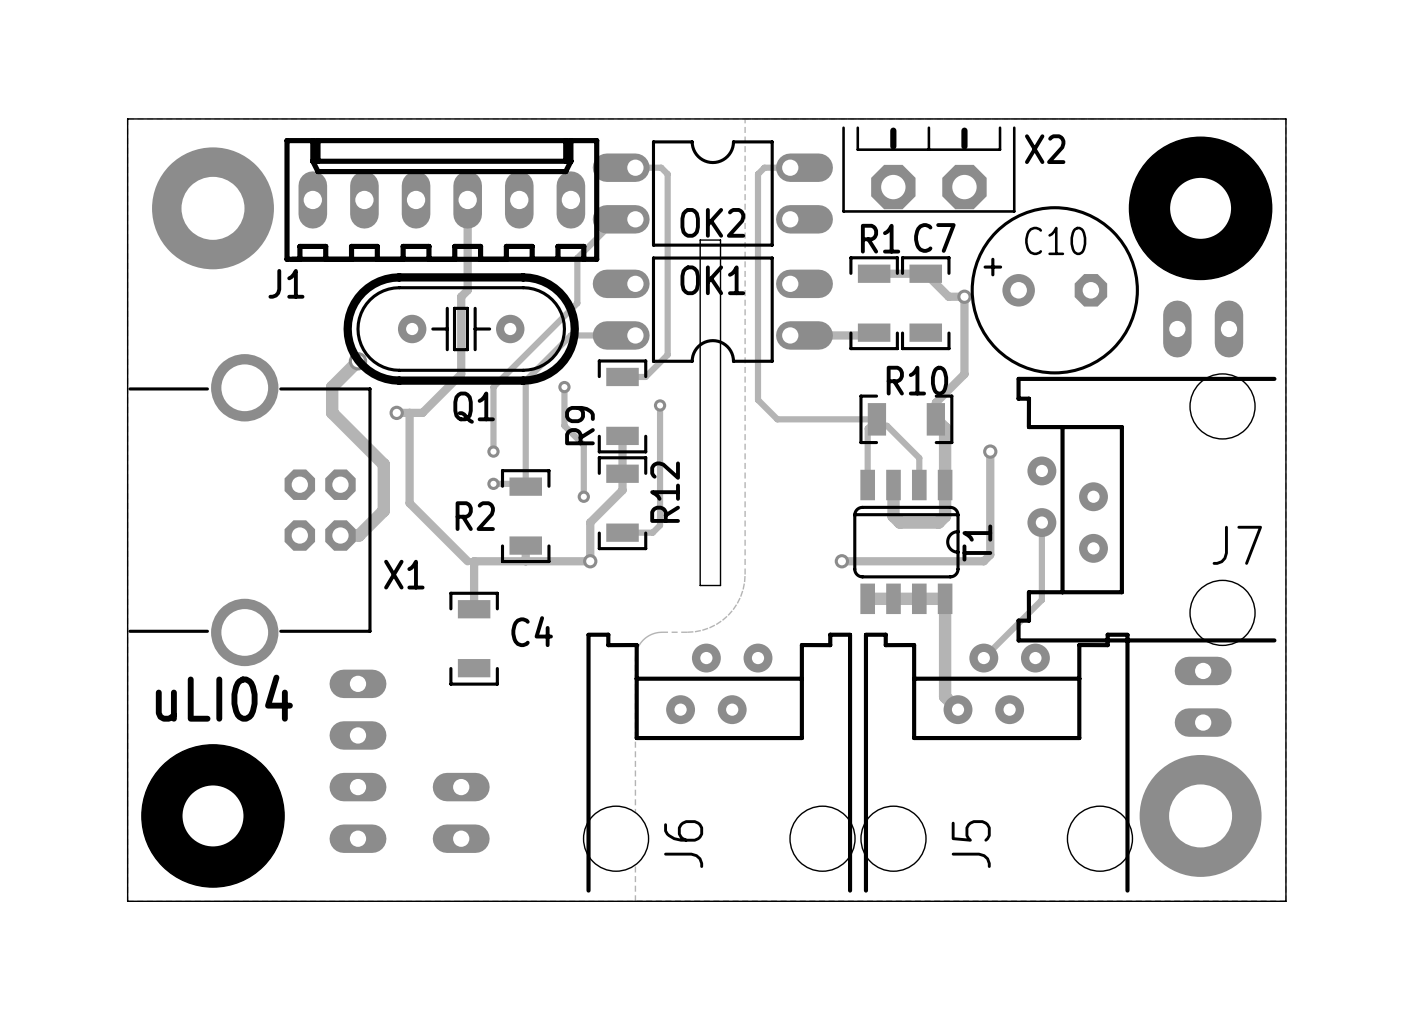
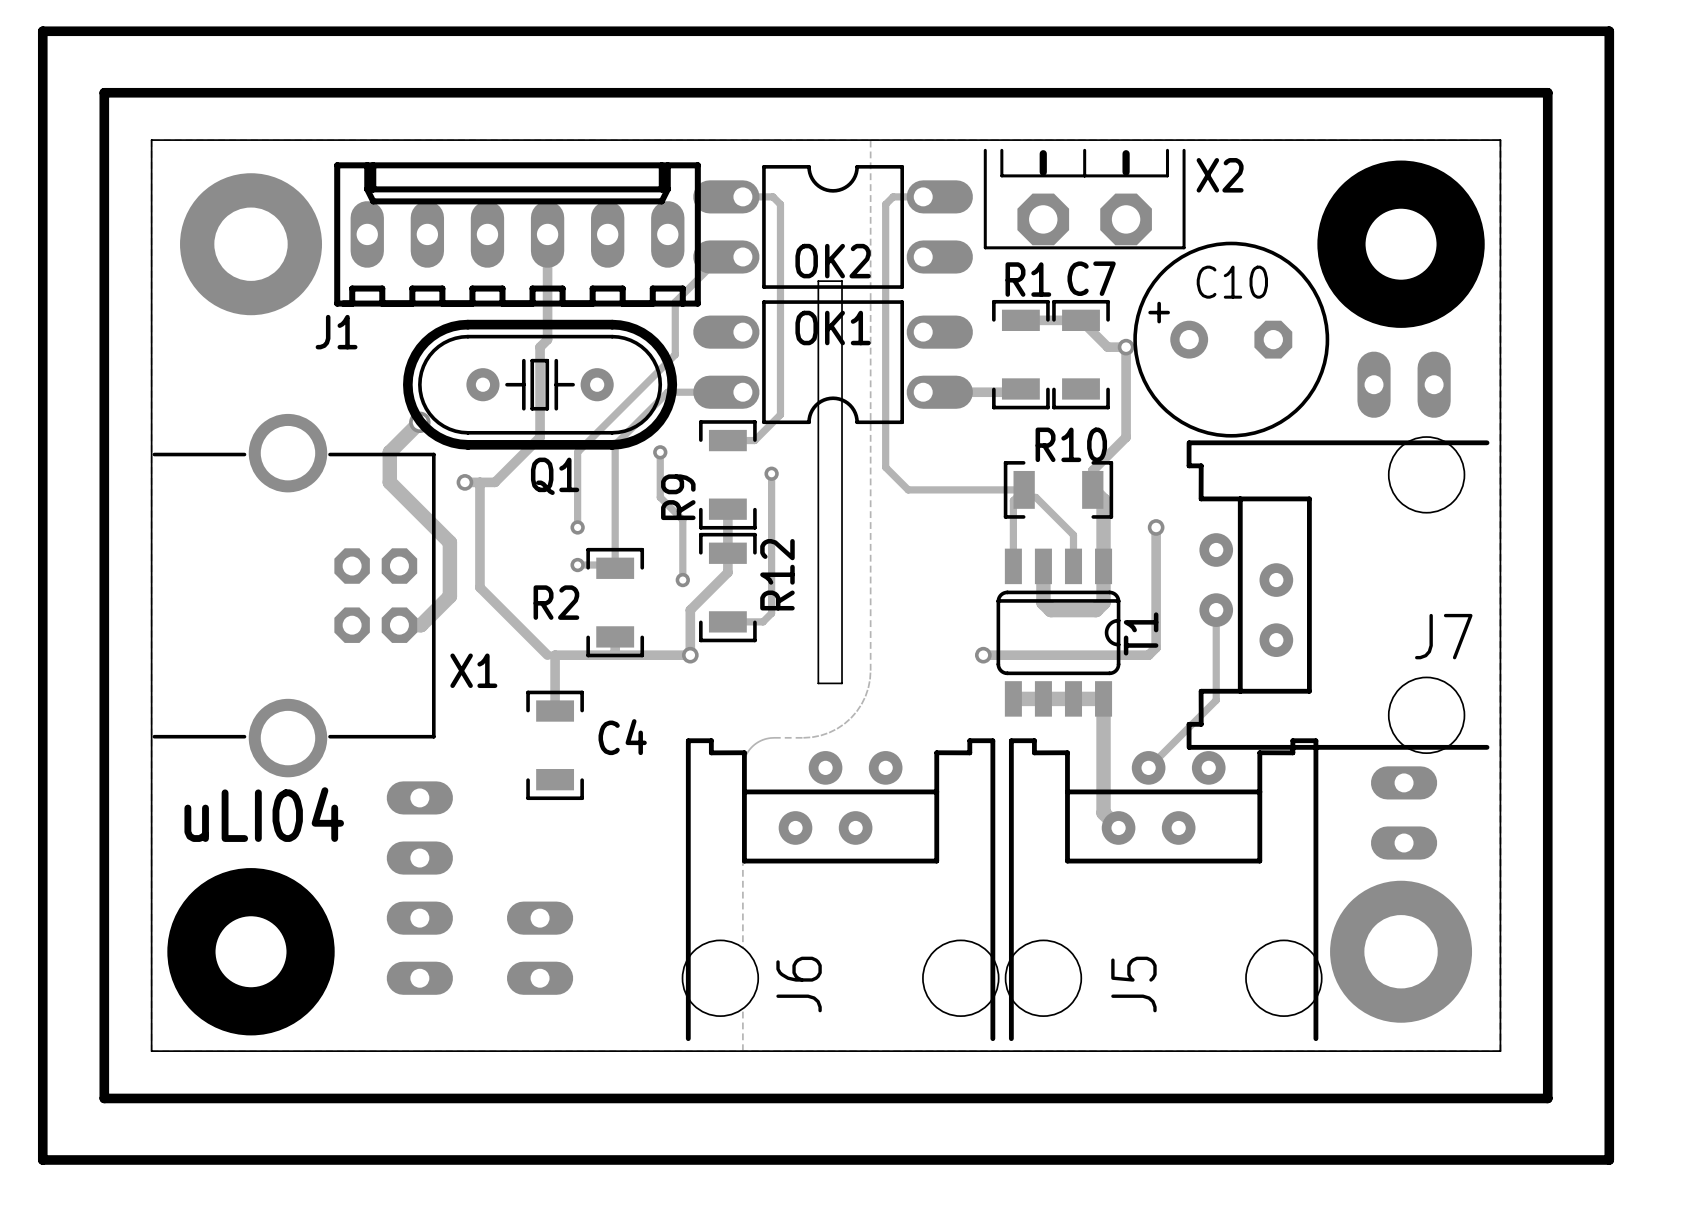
board edge: none -> (42, 31) (42, 1159) (1609, 1159) (1609, 31) (42, 31)
board edge: none -> (104, 92) (104, 1098) (1547, 1098) (1547, 92) (104, 92)

